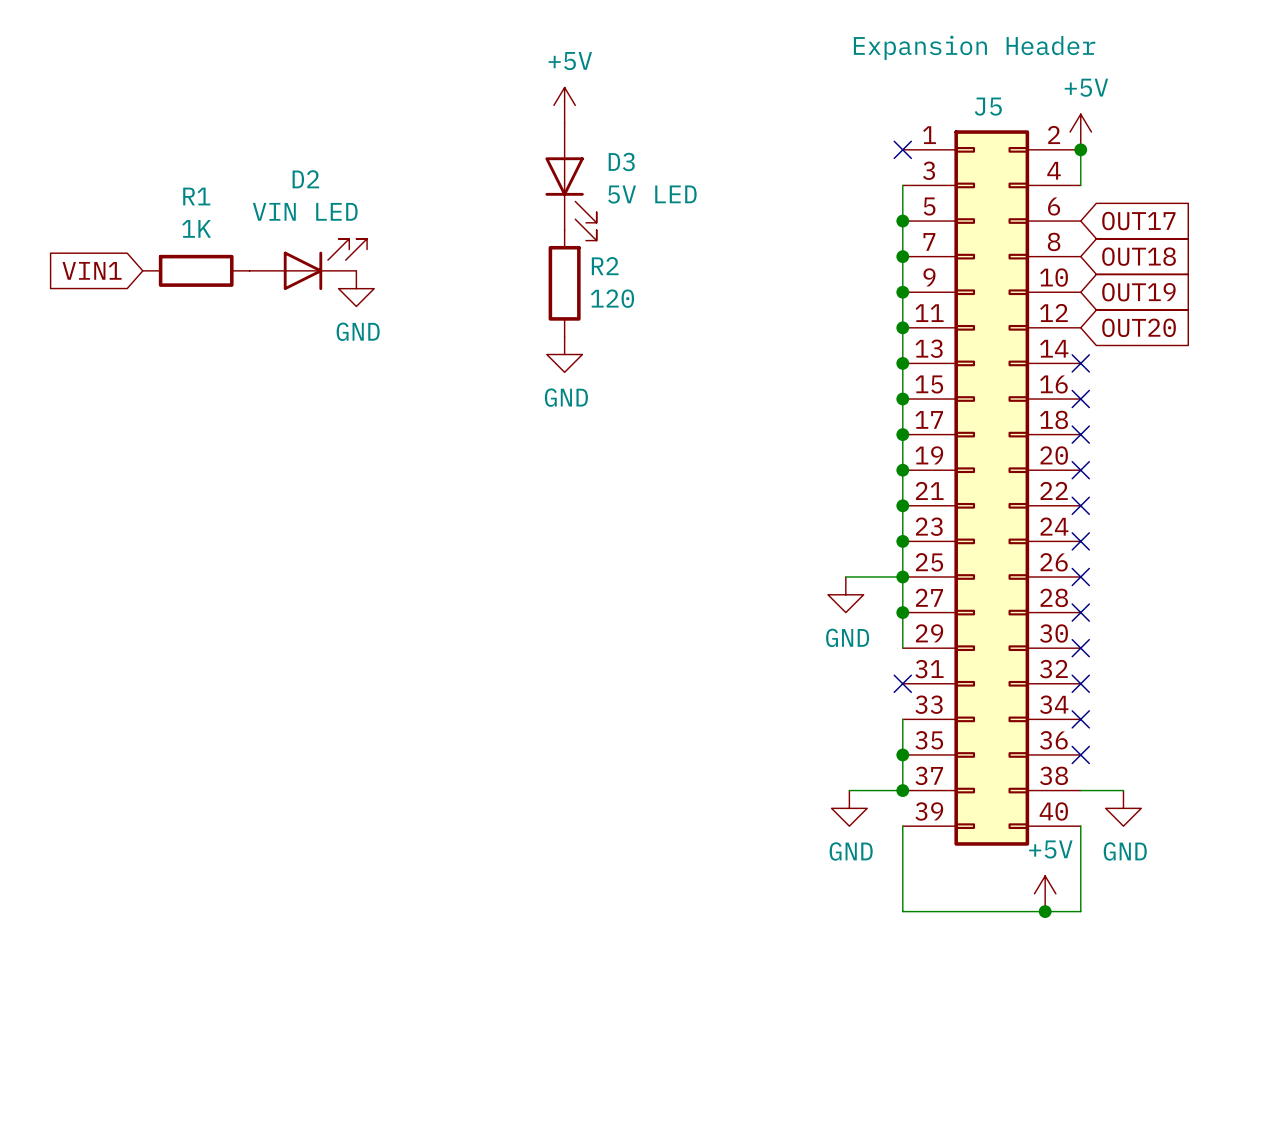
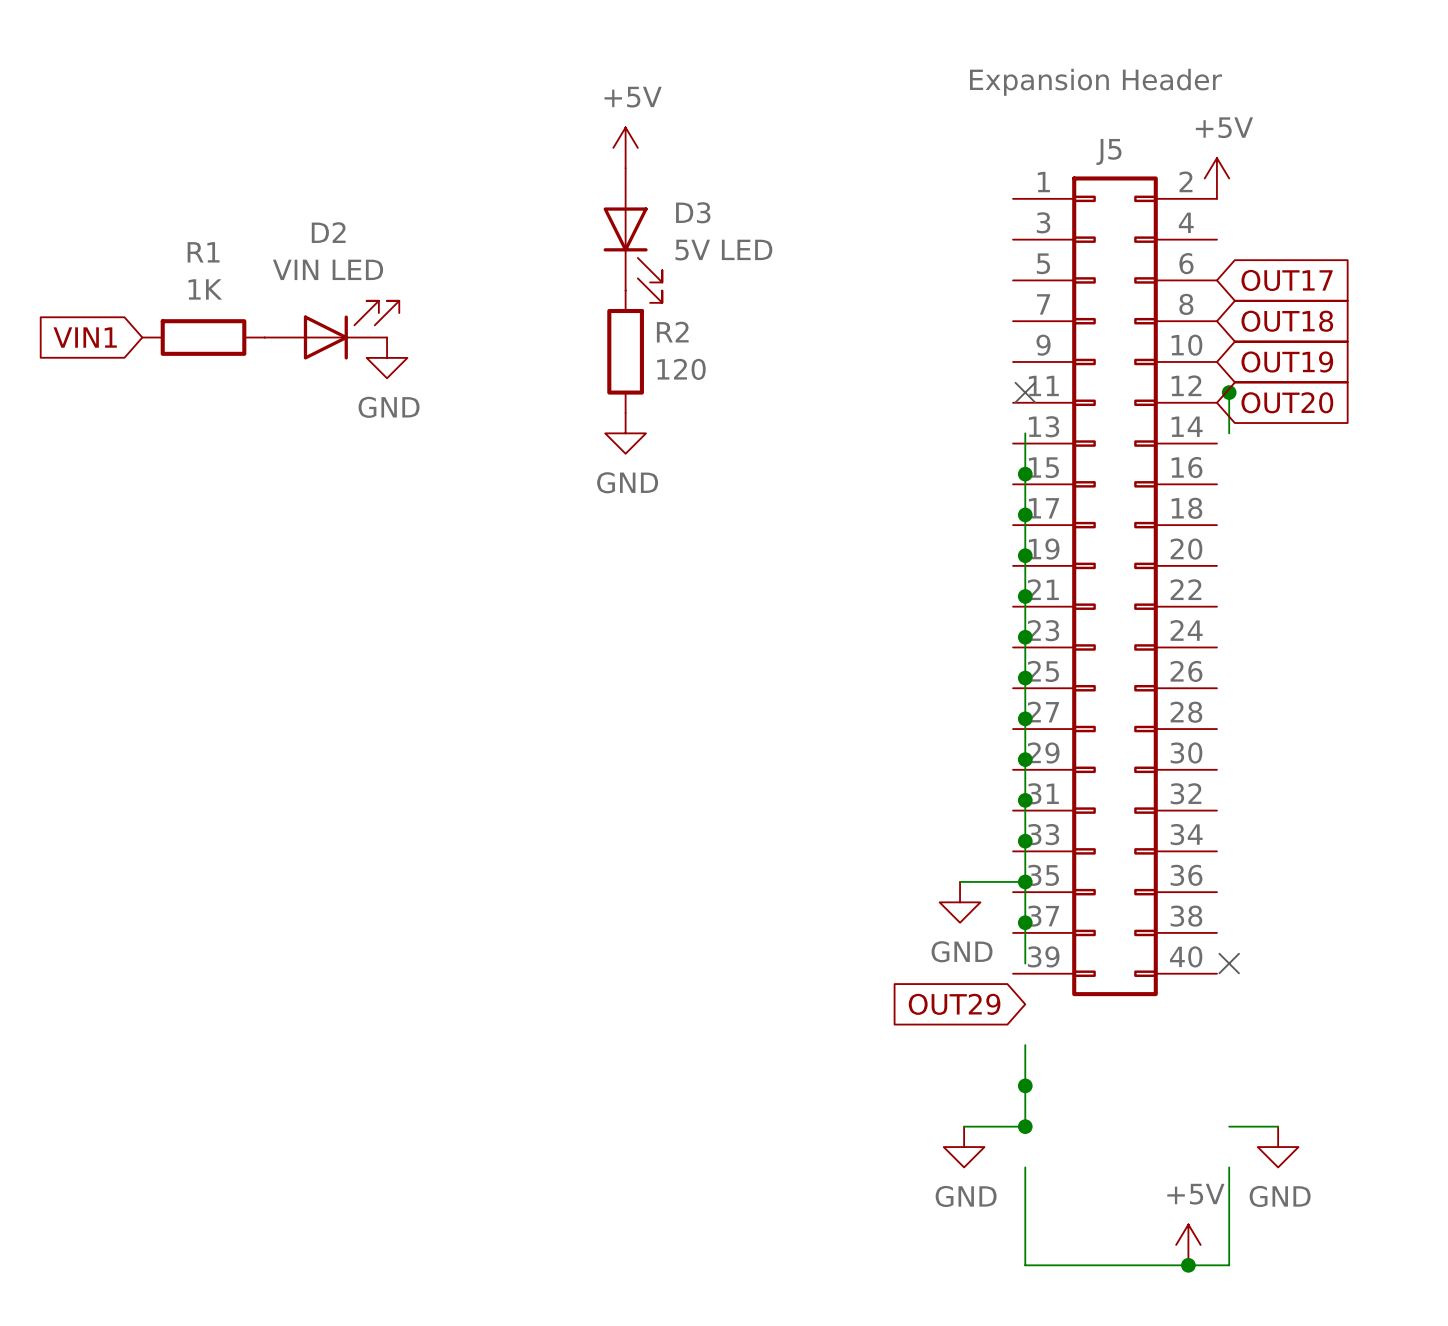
no-connect mark: (902, 149) -> none
wire: (1080, 149) (1080, 185) -> (1229, 392) (1229, 433)
junction: (1080, 149) -> none
wire: (902, 185) (902, 648) -> (1025, 433) (1025, 963)
junction: (902, 221) -> none
junction: (902, 256) -> none
junction: (902, 292) -> none
no-connect mark: none -> (1025, 392)
junction: none -> (1229, 392)
junction: (902, 327) -> none
junction: (902, 363) -> none
no-connect mark: (1080, 363) -> none
junction position: (902, 399) -> (1025, 474)
no-connect mark: (1080, 399) -> none
junction position: (902, 434) -> (1025, 514)
no-connect mark: (1080, 434) -> none
junction position: (902, 470) -> (1025, 555)
no-connect mark: (1080, 470) -> none
junction position: (902, 505) -> (1025, 596)
no-connect mark: (1080, 505) -> none
junction position: (902, 541) -> (1025, 637)
no-connect mark: (1080, 541) -> none
wire: (845, 576) (902, 576) -> (960, 881) (1025, 881)
junction position: (902, 576) -> (1025, 678)
no-connect mark: (1080, 576) -> none
power symbol: GND (845, 594) -> none
junction position: (902, 612) -> (1025, 718)
no-connect mark: (1080, 612) -> none
junction: none -> (1025, 759)
no-connect mark: (1080, 648) -> none
junction: none -> (1025, 800)
no-connect mark: (902, 683) -> none
no-connect mark: (1080, 683) -> none
junction: none -> (1025, 841)
wire: (902, 719) (902, 790) (849, 790) -> (1025, 1045) (1025, 1126) (964, 1126)
no-connect mark: (1080, 719) -> none
junction position: (902, 754) -> (1025, 881)
no-connect mark: (1080, 754) -> none
junction position: (902, 790) -> (1025, 922)
wire: (1080, 790) (1123, 790) -> (1229, 1126) (1278, 1126)
power symbol position: GND (849, 808) -> GND (960, 902)
power symbol: GND (1123, 808) -> none
no-connect mark: none -> (1229, 963)
wire: (902, 826) (902, 911) (1080, 911) (1080, 826) -> (1025, 1167) (1025, 1265) (1229, 1265) (1229, 1167)
global label: none -> OUT29 (954, 1004)
power symbol position: +5V (1045, 893) -> +5V (1188, 1244)
junction: (1045, 911) -> none
junction: none -> (1025, 1085)
junction: none -> (1025, 1126)
power symbol: none -> GND (964, 1147)
power symbol: none -> GND (1278, 1147)
junction: none -> (1188, 1265)

